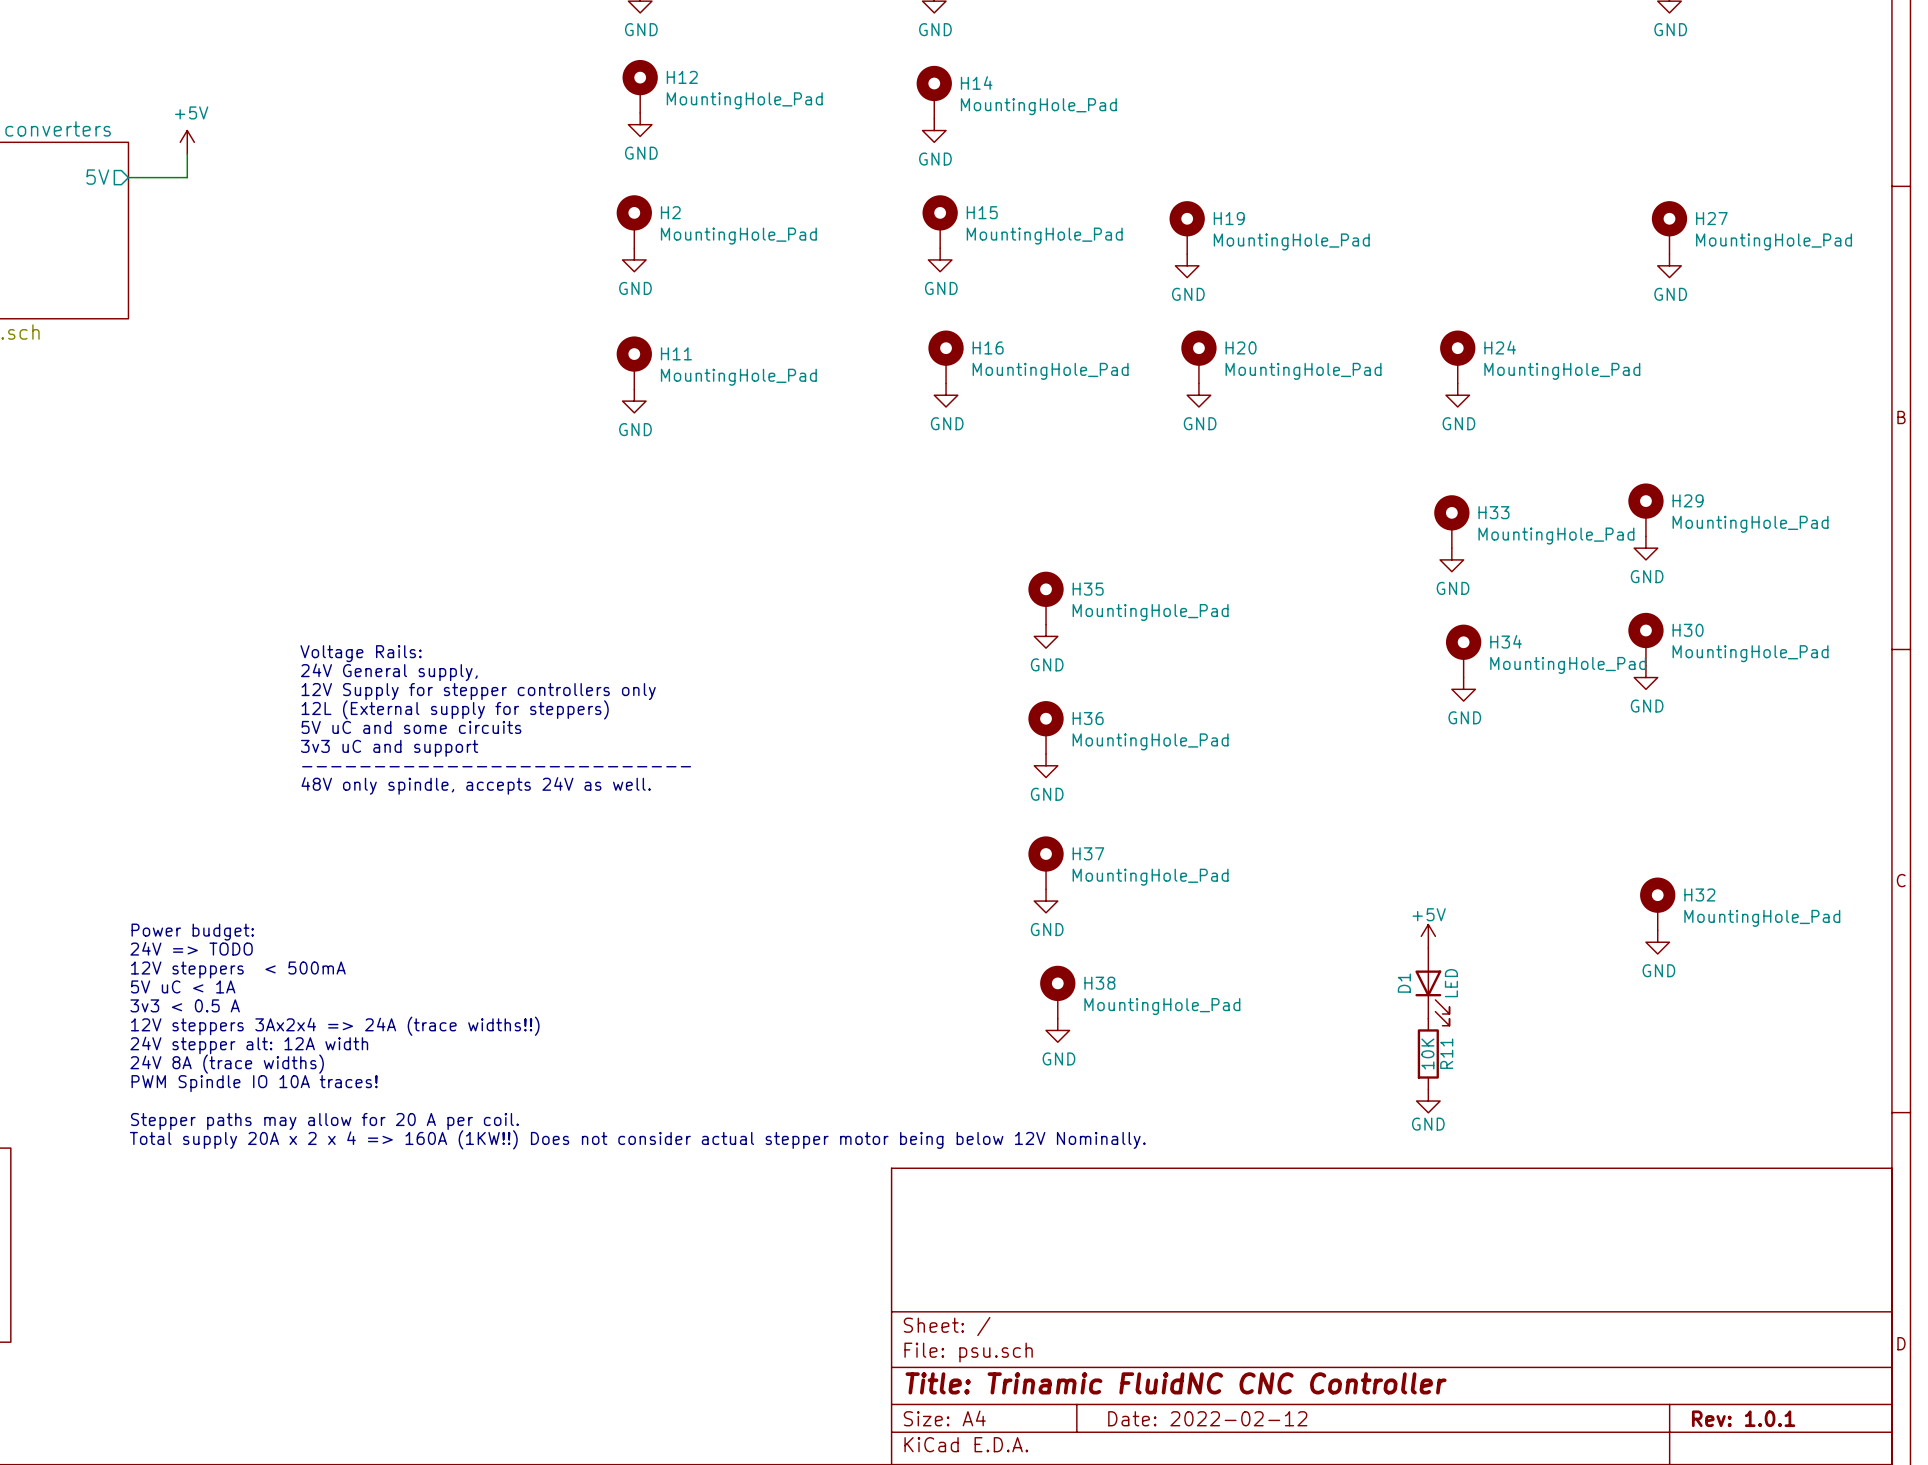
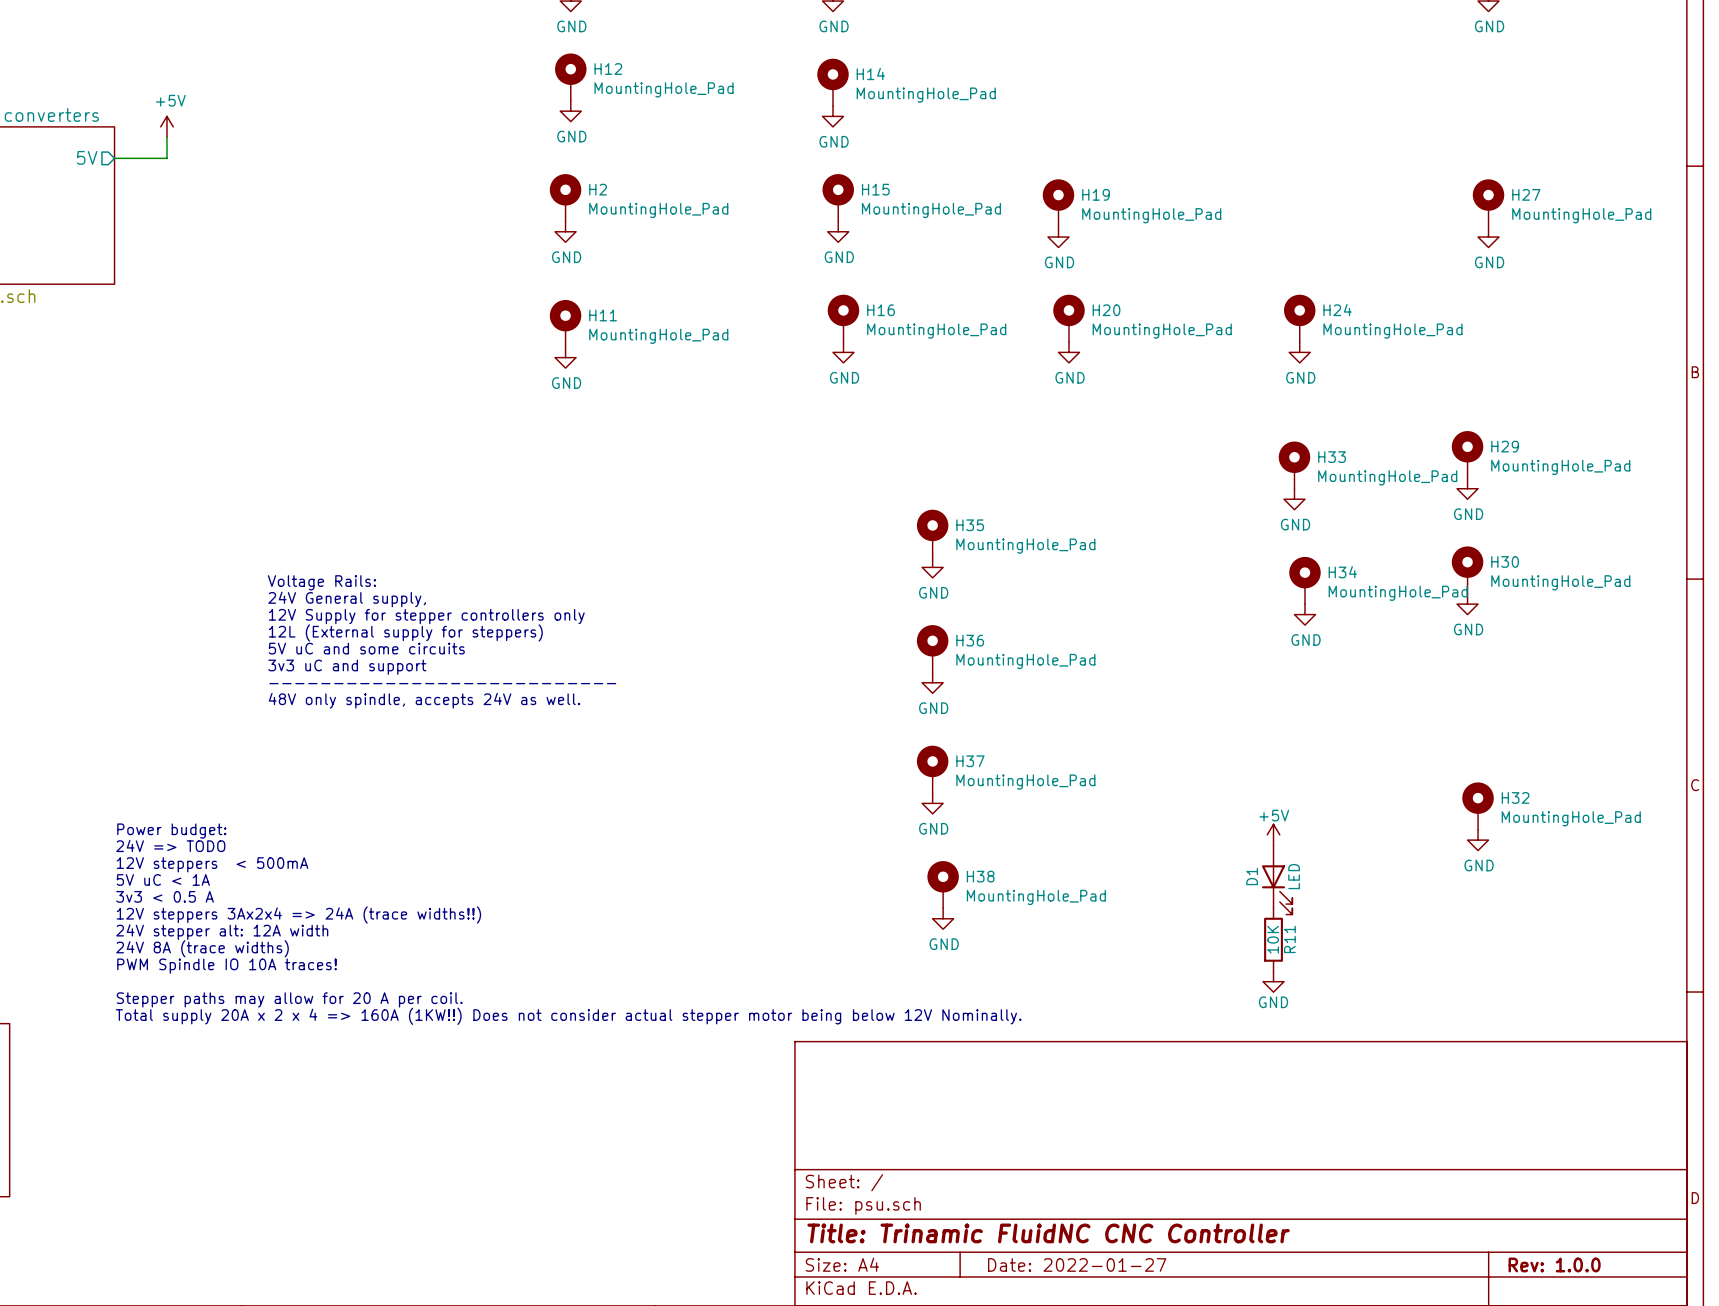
title block: Date: 2022-02-12 (1207, 1418) -> Date: 2022-01-27 (1077, 1264)
title block: Rev: 1.0.1 (1743, 1418) -> Rev: 1.0.0 (1554, 1264)

